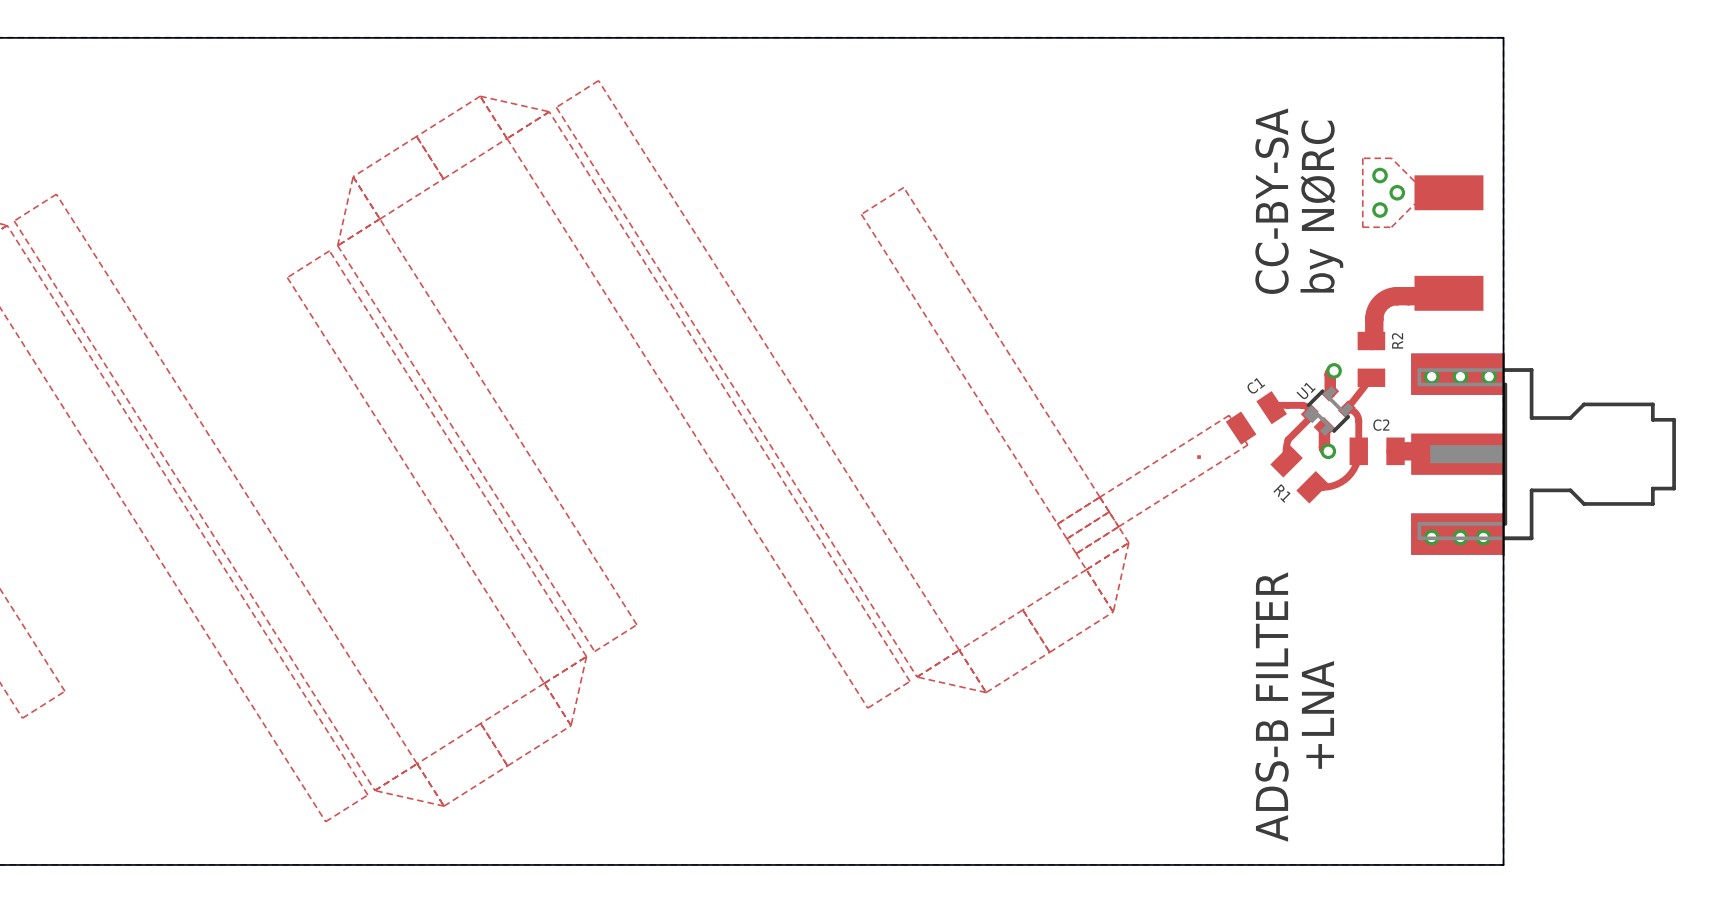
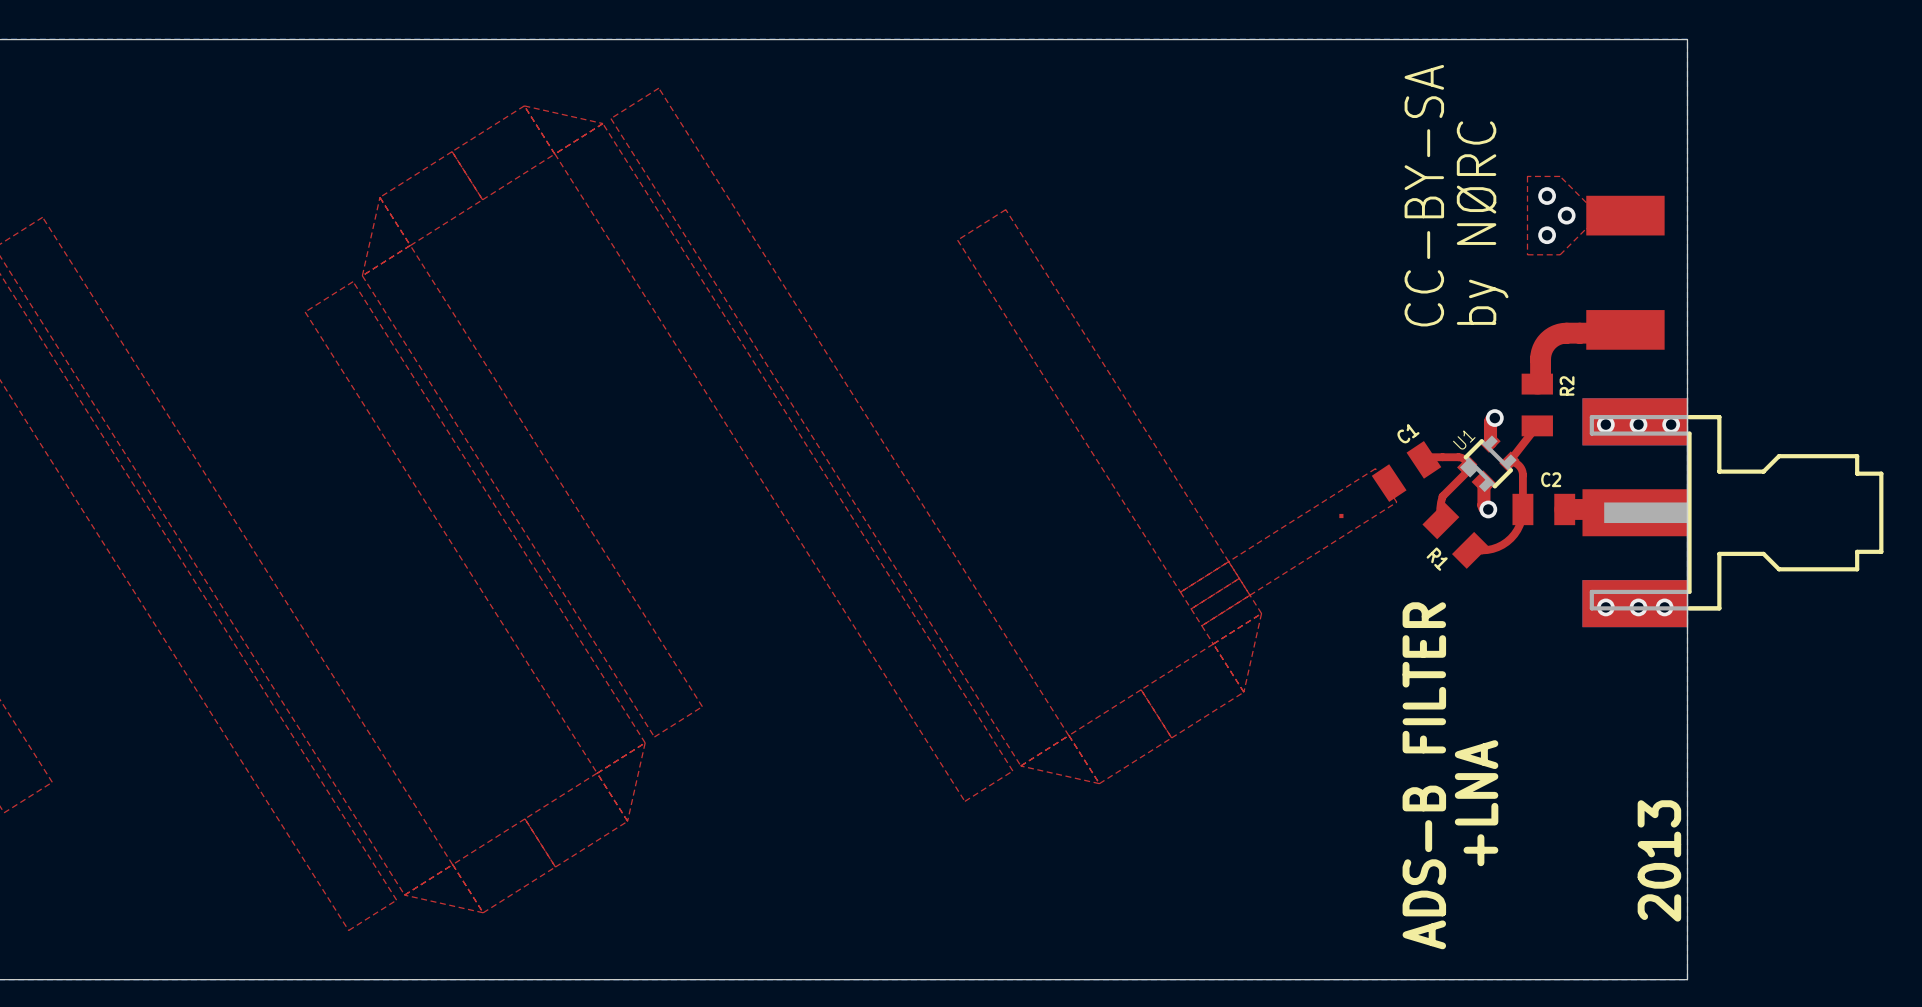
text: none -> 2013 (1659, 860)

